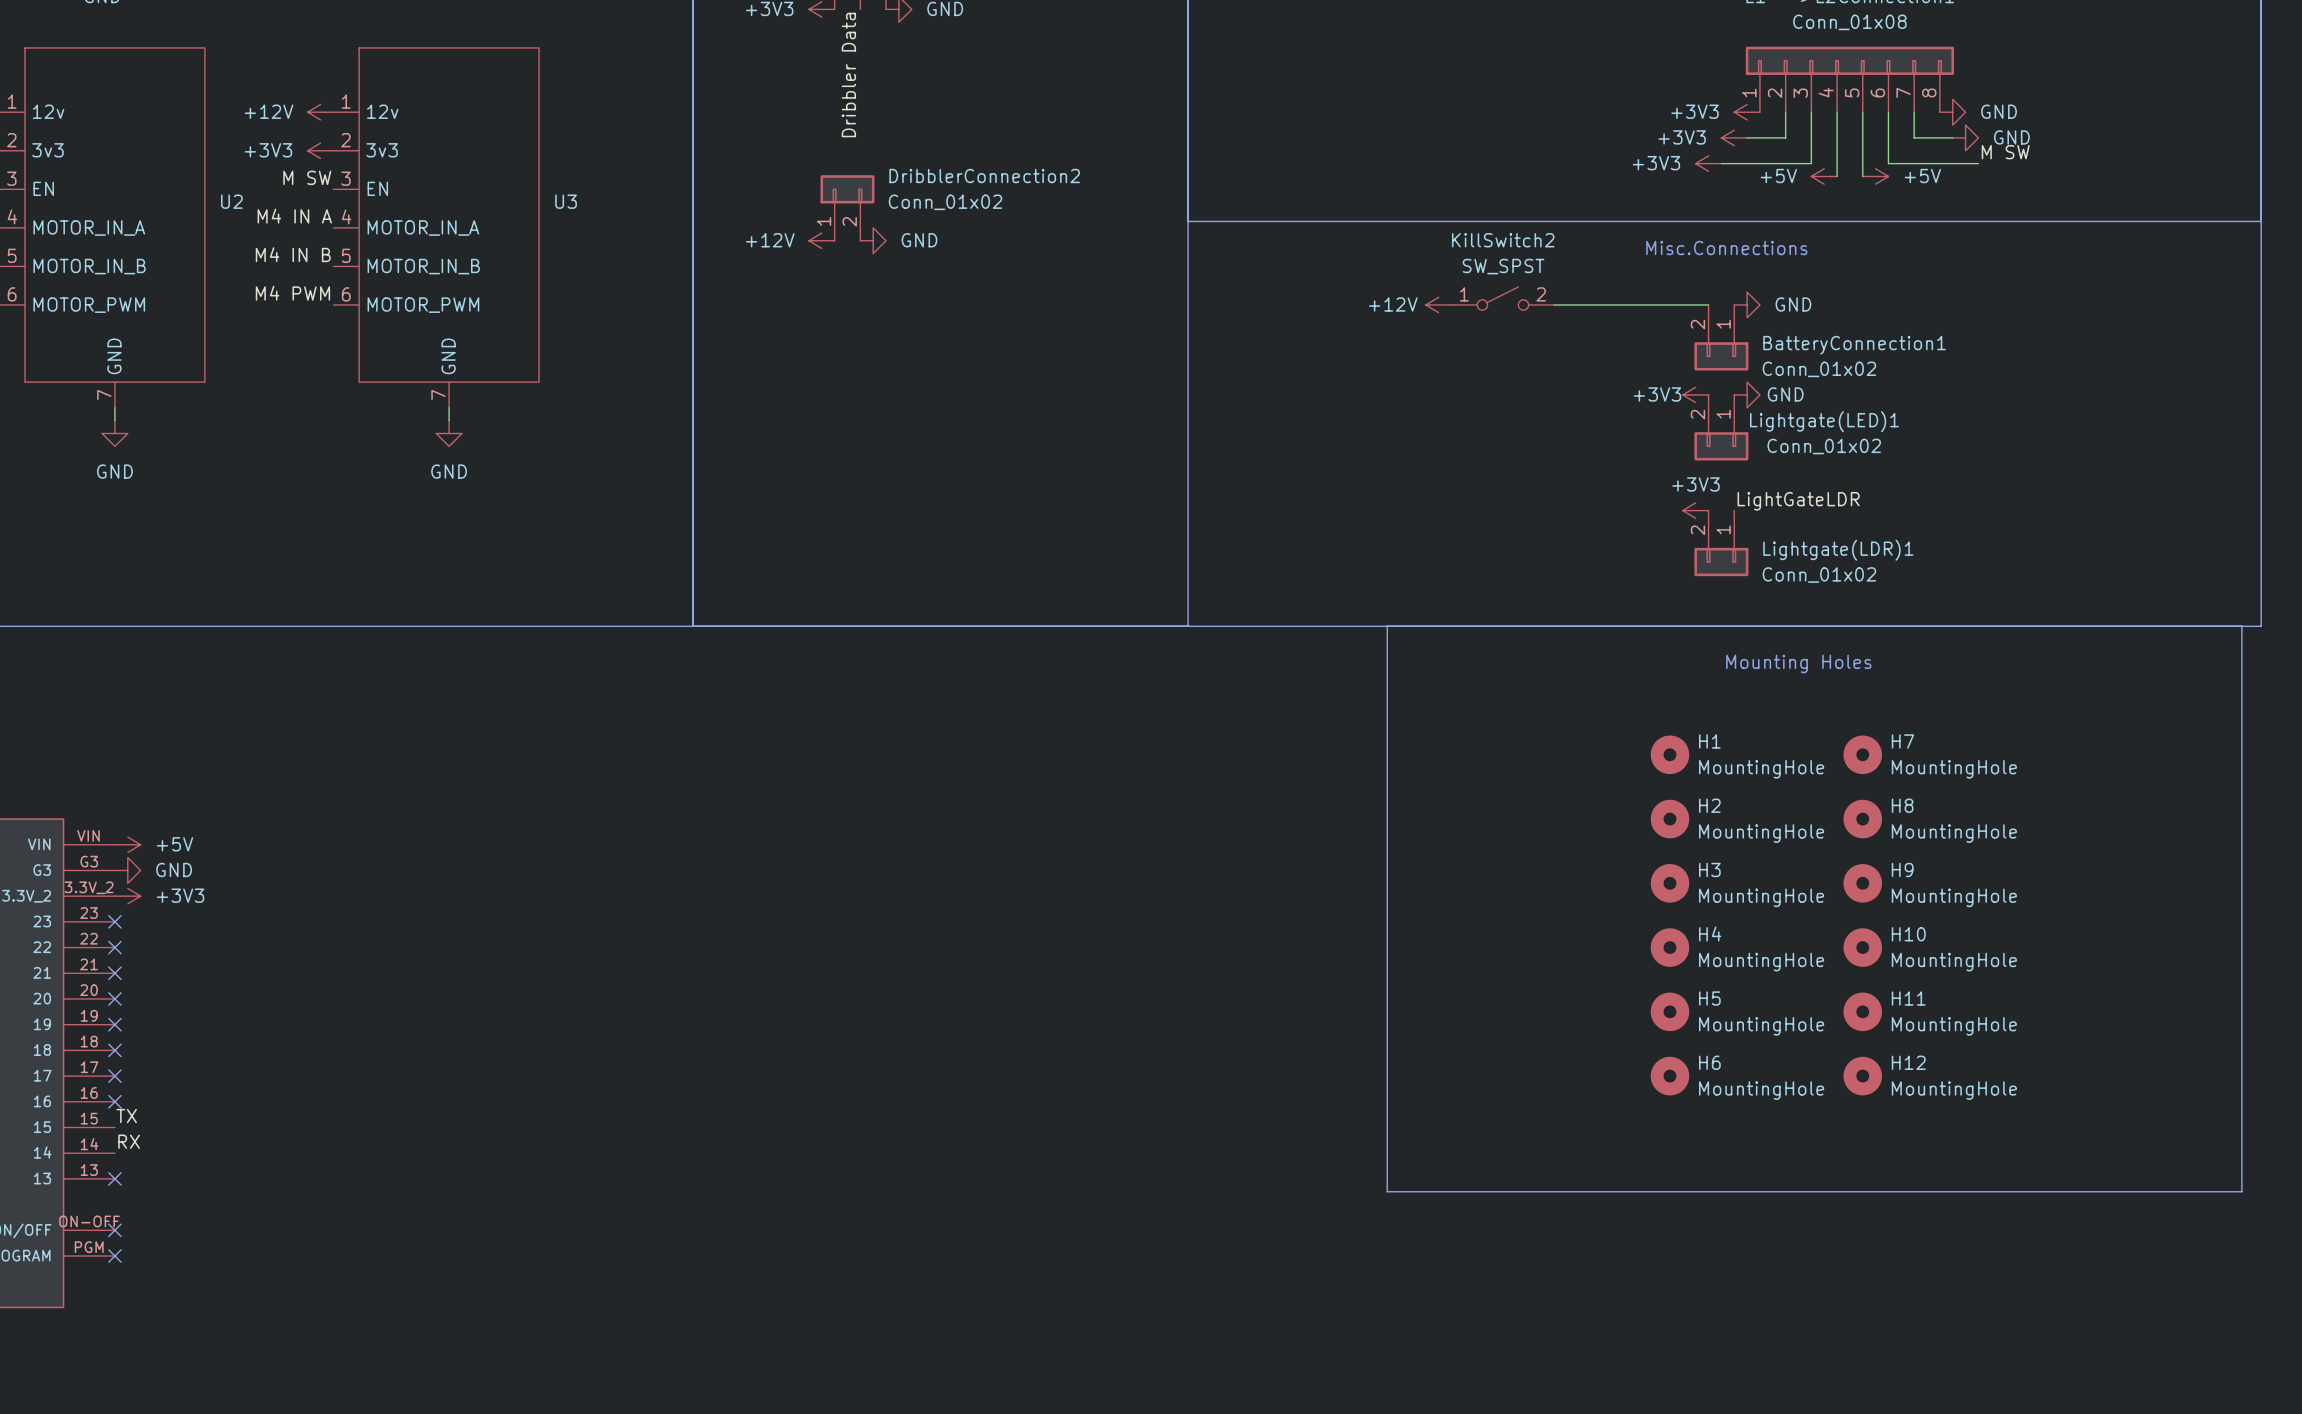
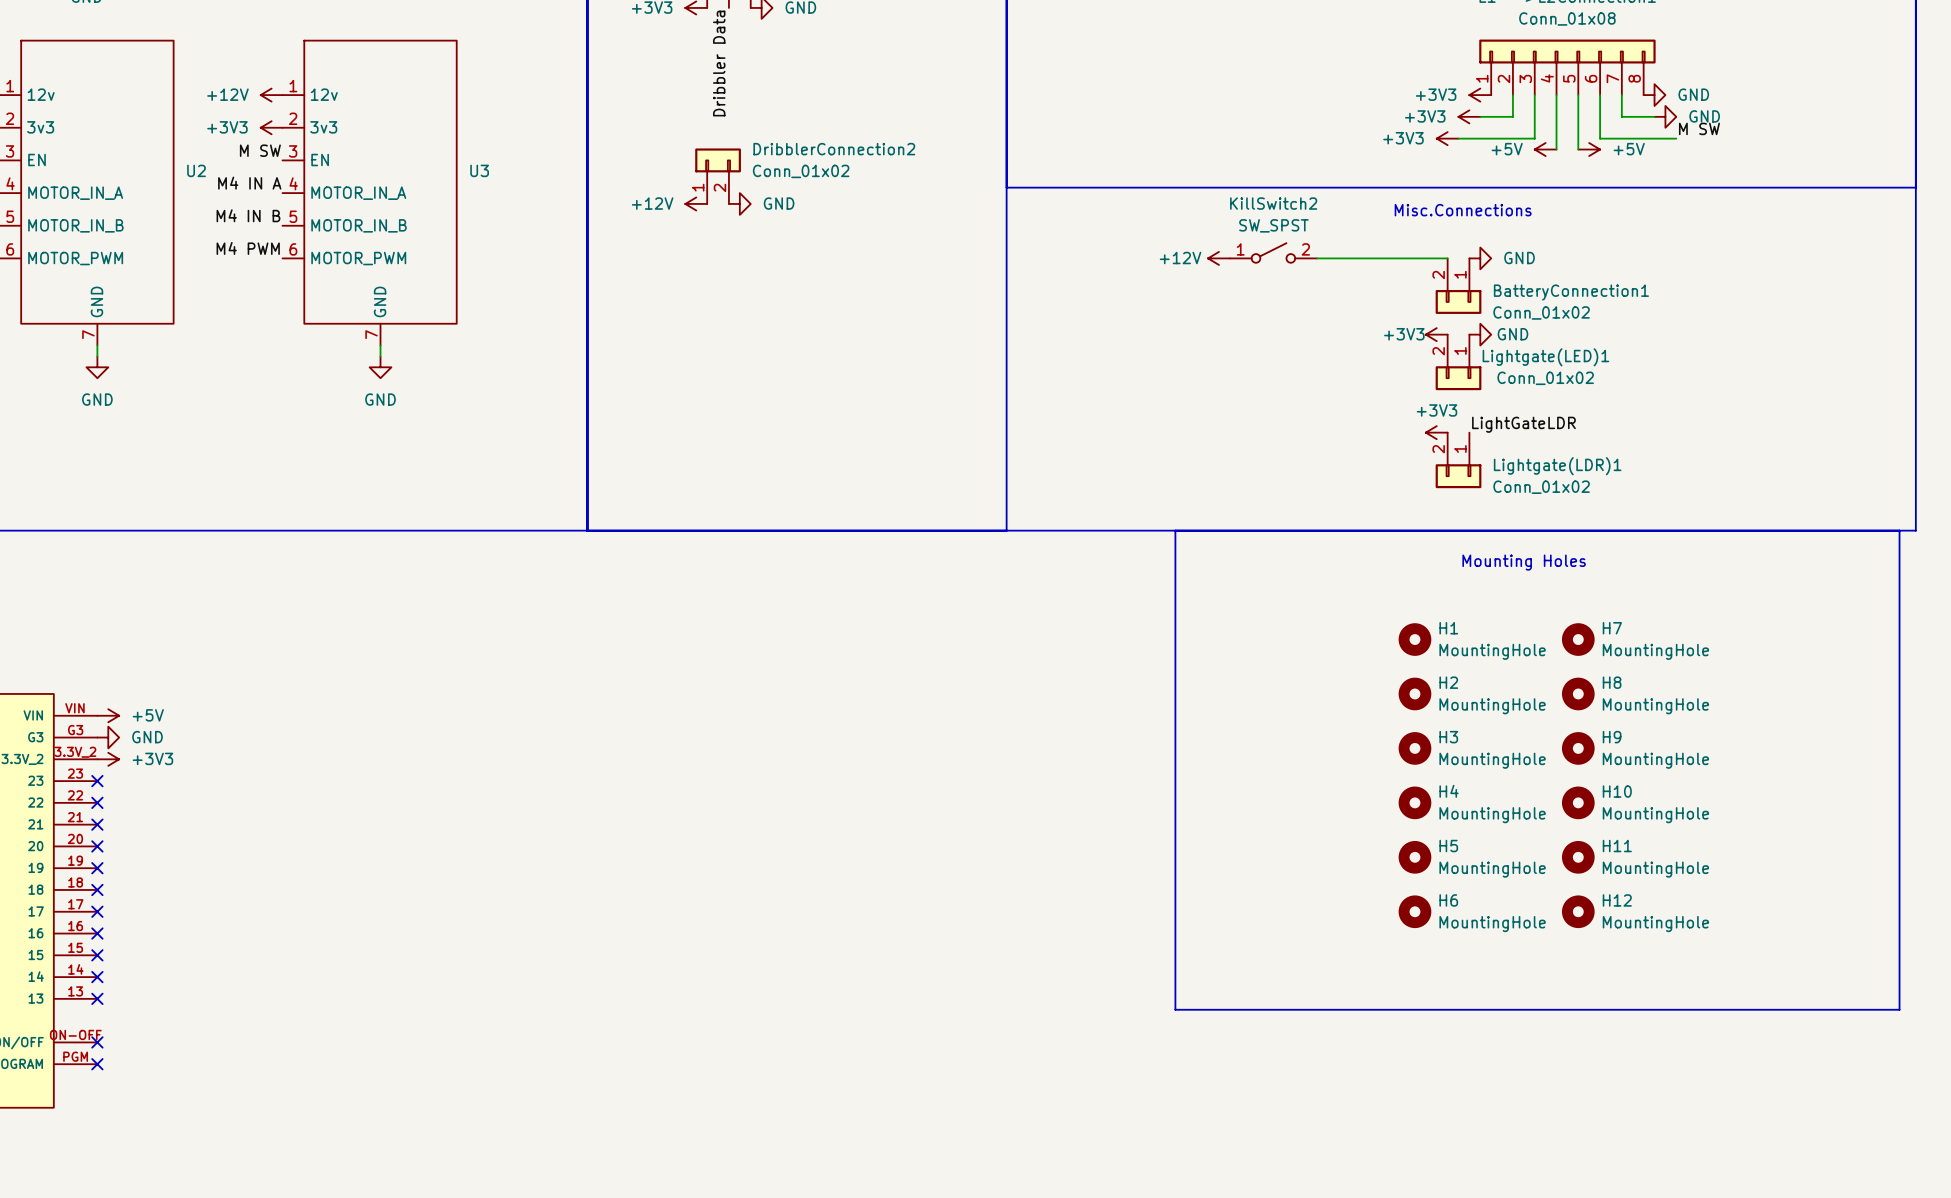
label: TX (126, 1116) -> none
no-connect mark: none -> (97, 955)
label: RX (129, 1141) -> none
no-connect mark: none -> (97, 977)

